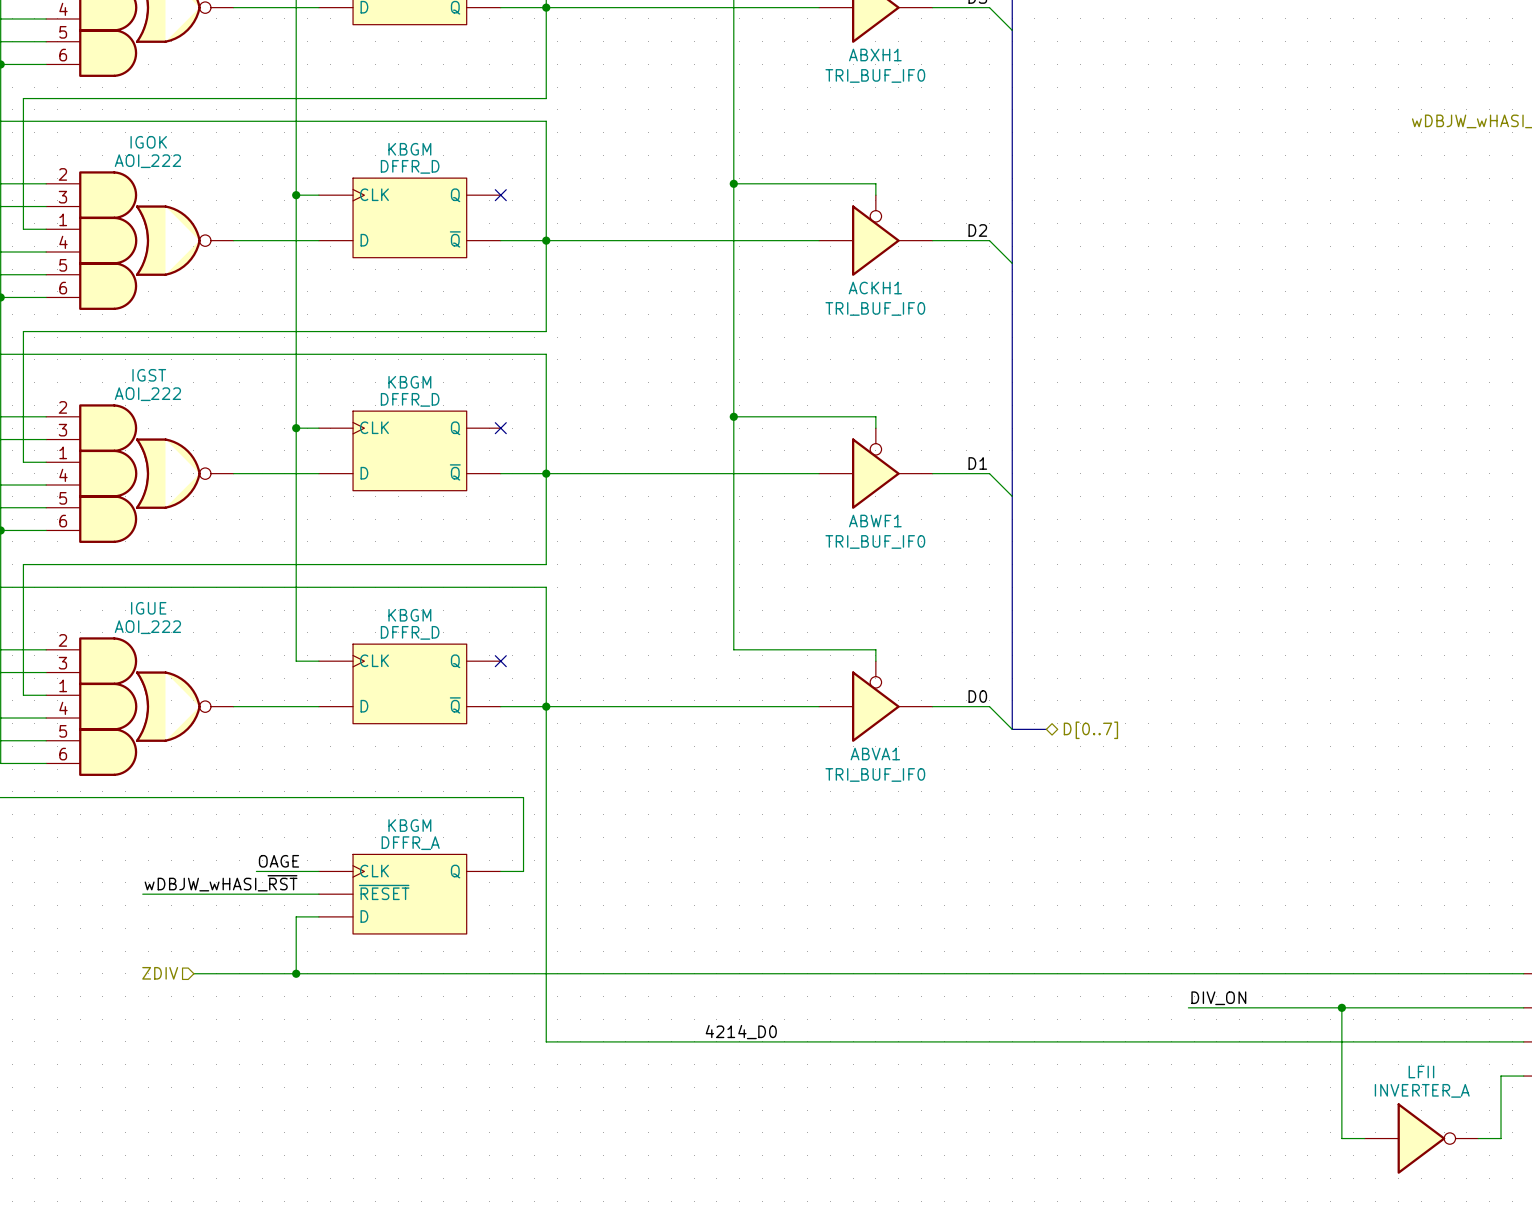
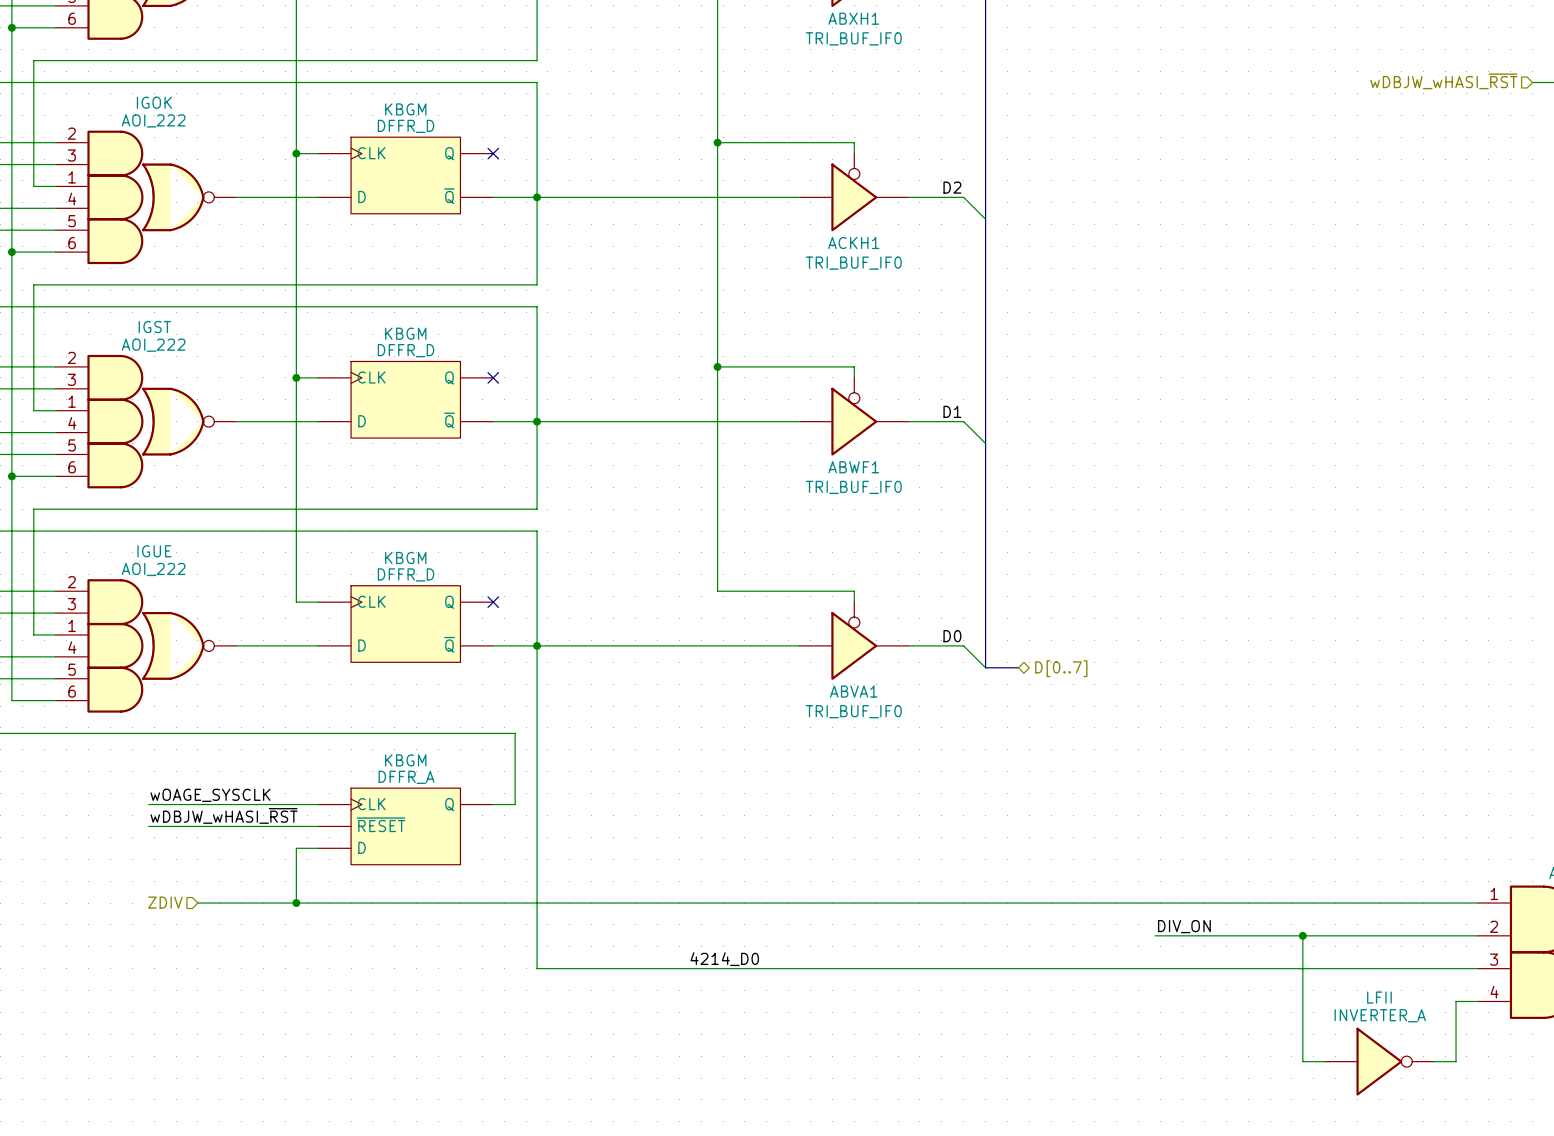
label: none -> wOAGE_SYSCLK (210, 795)
label: OAGE (278, 861) -> none
wire: none -> (148, 804) (258, 804)

